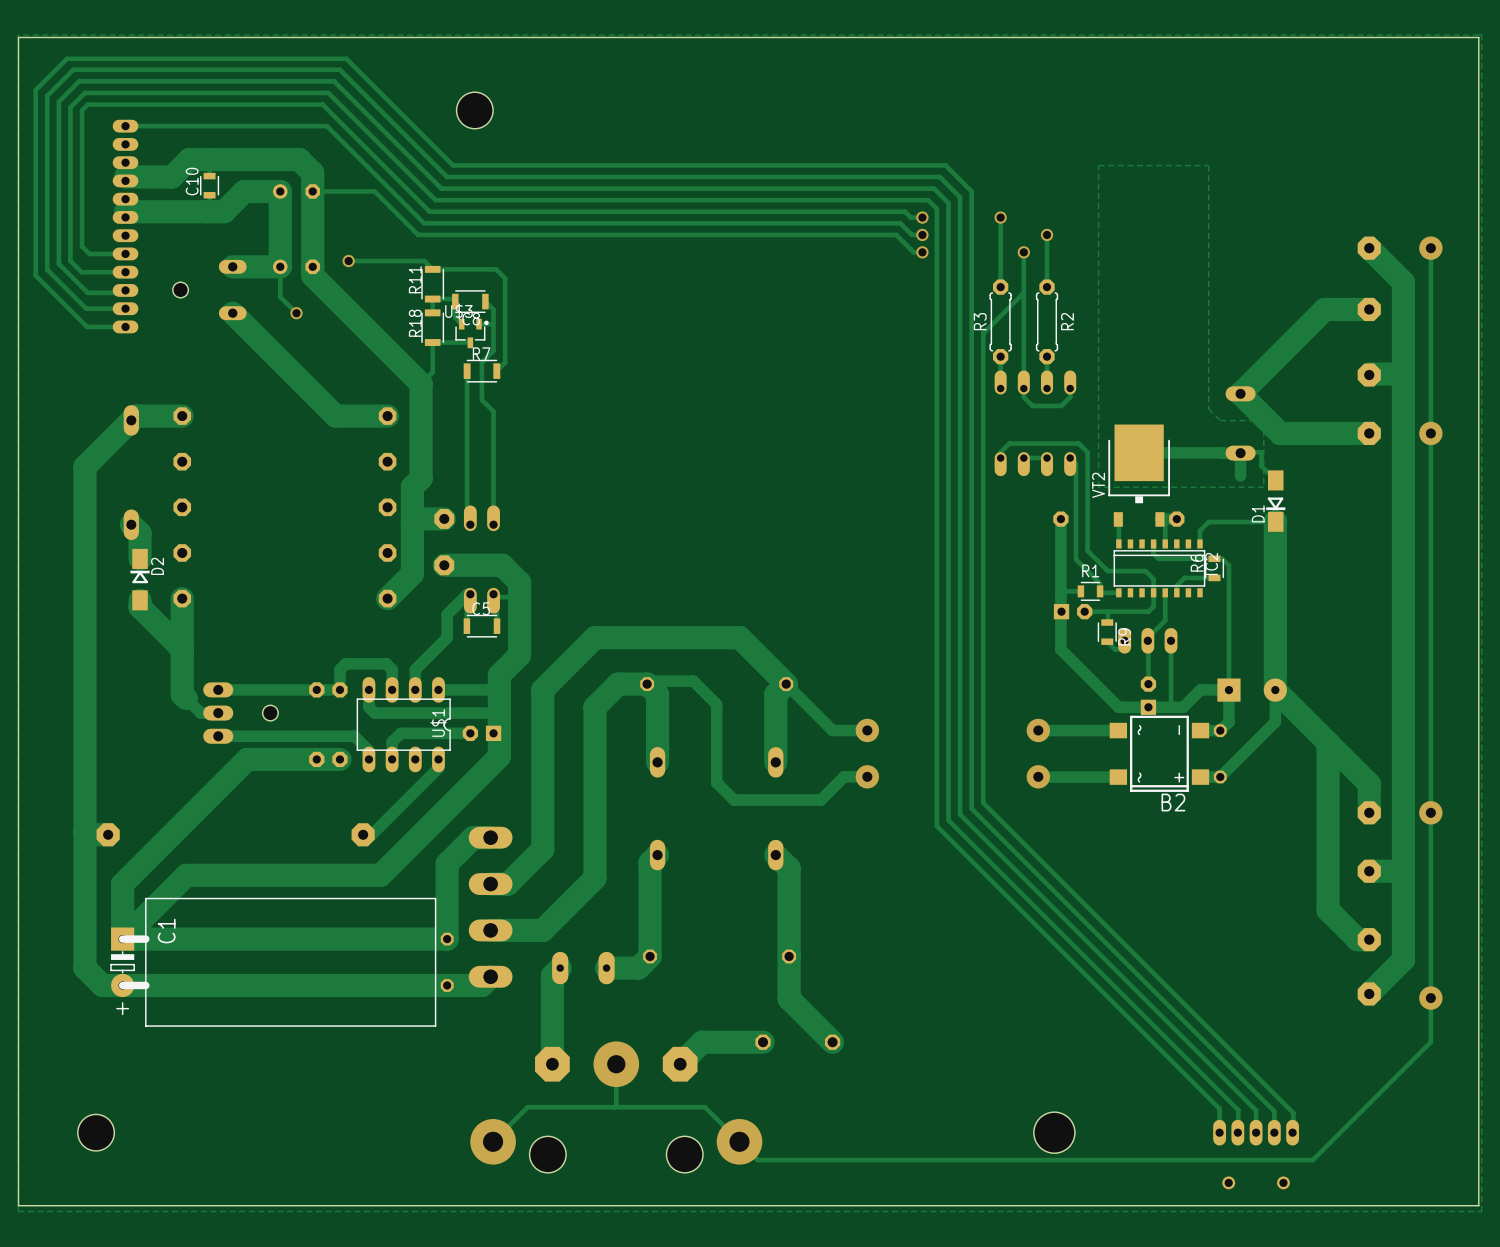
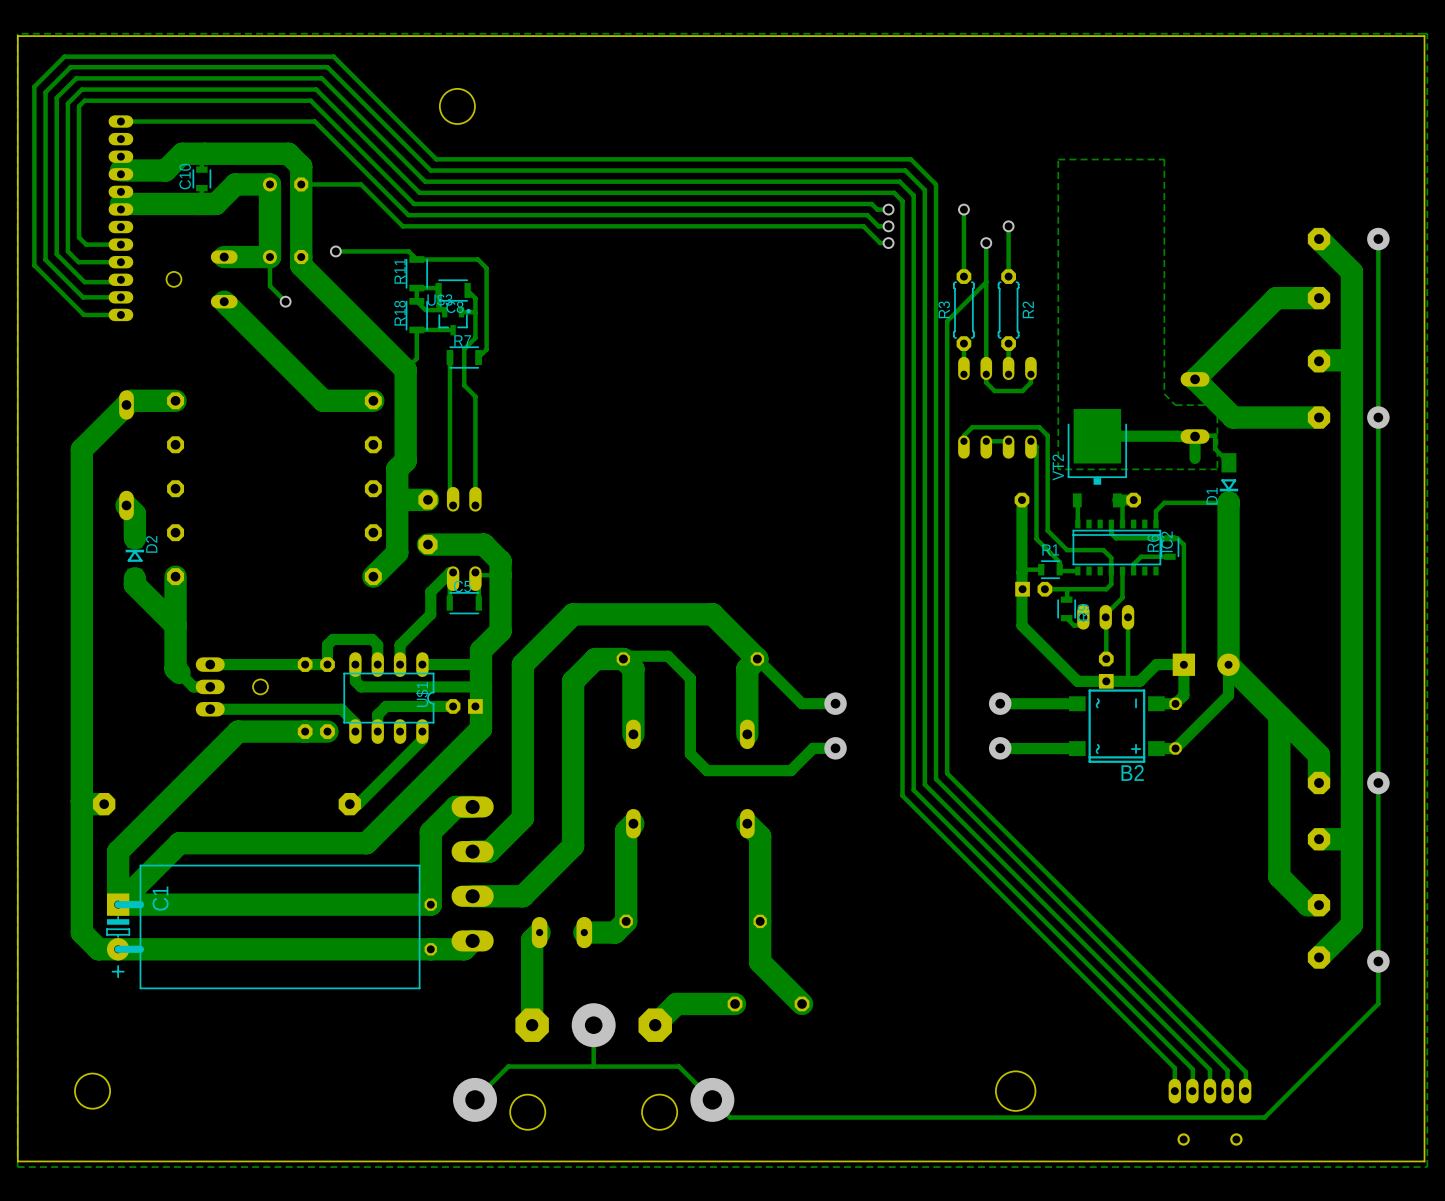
track: none -> (416, 301) (425, 310) (442, 310)

